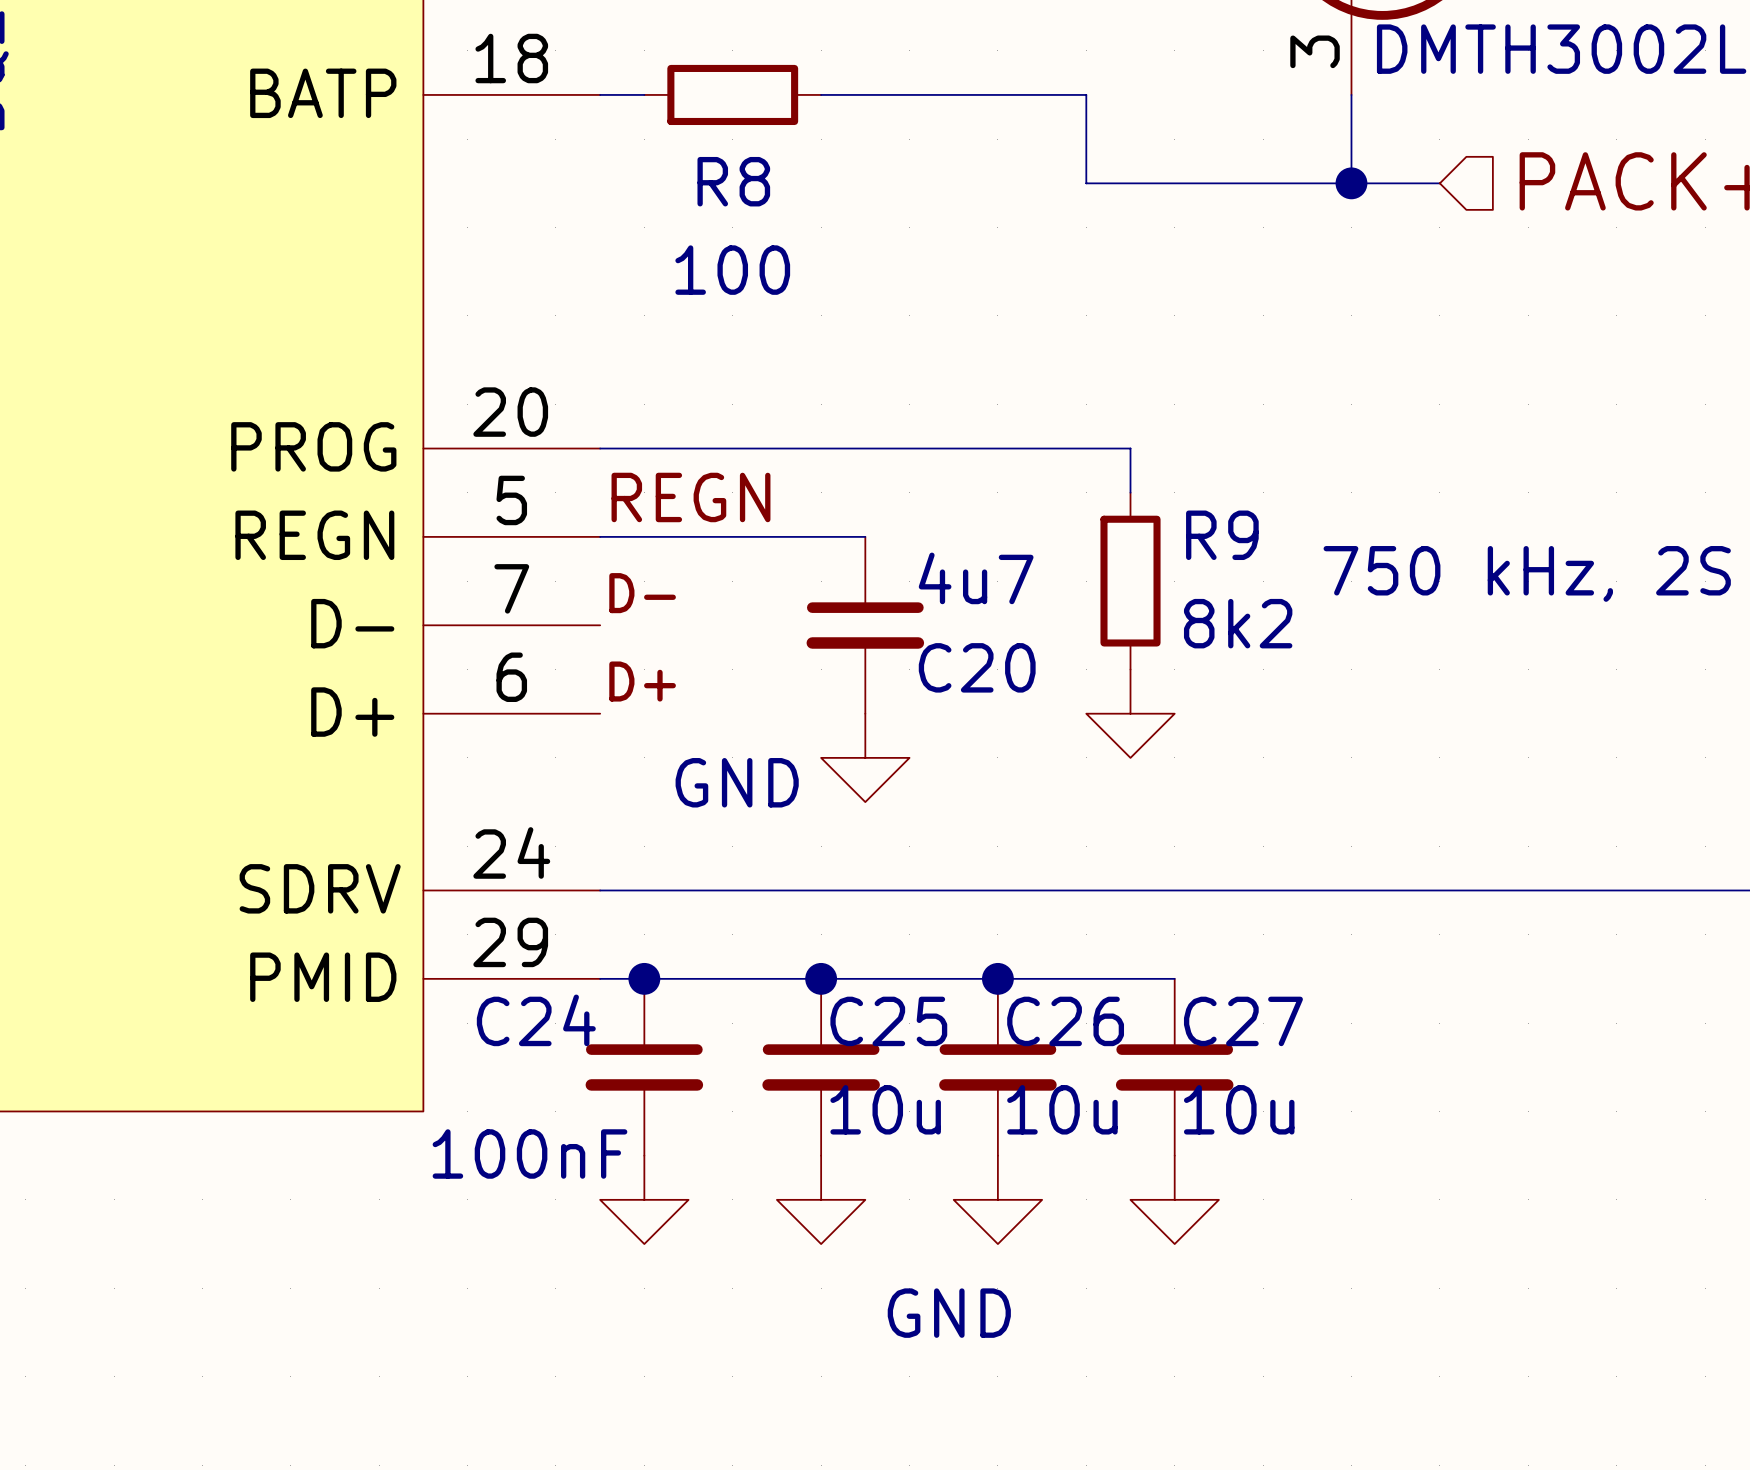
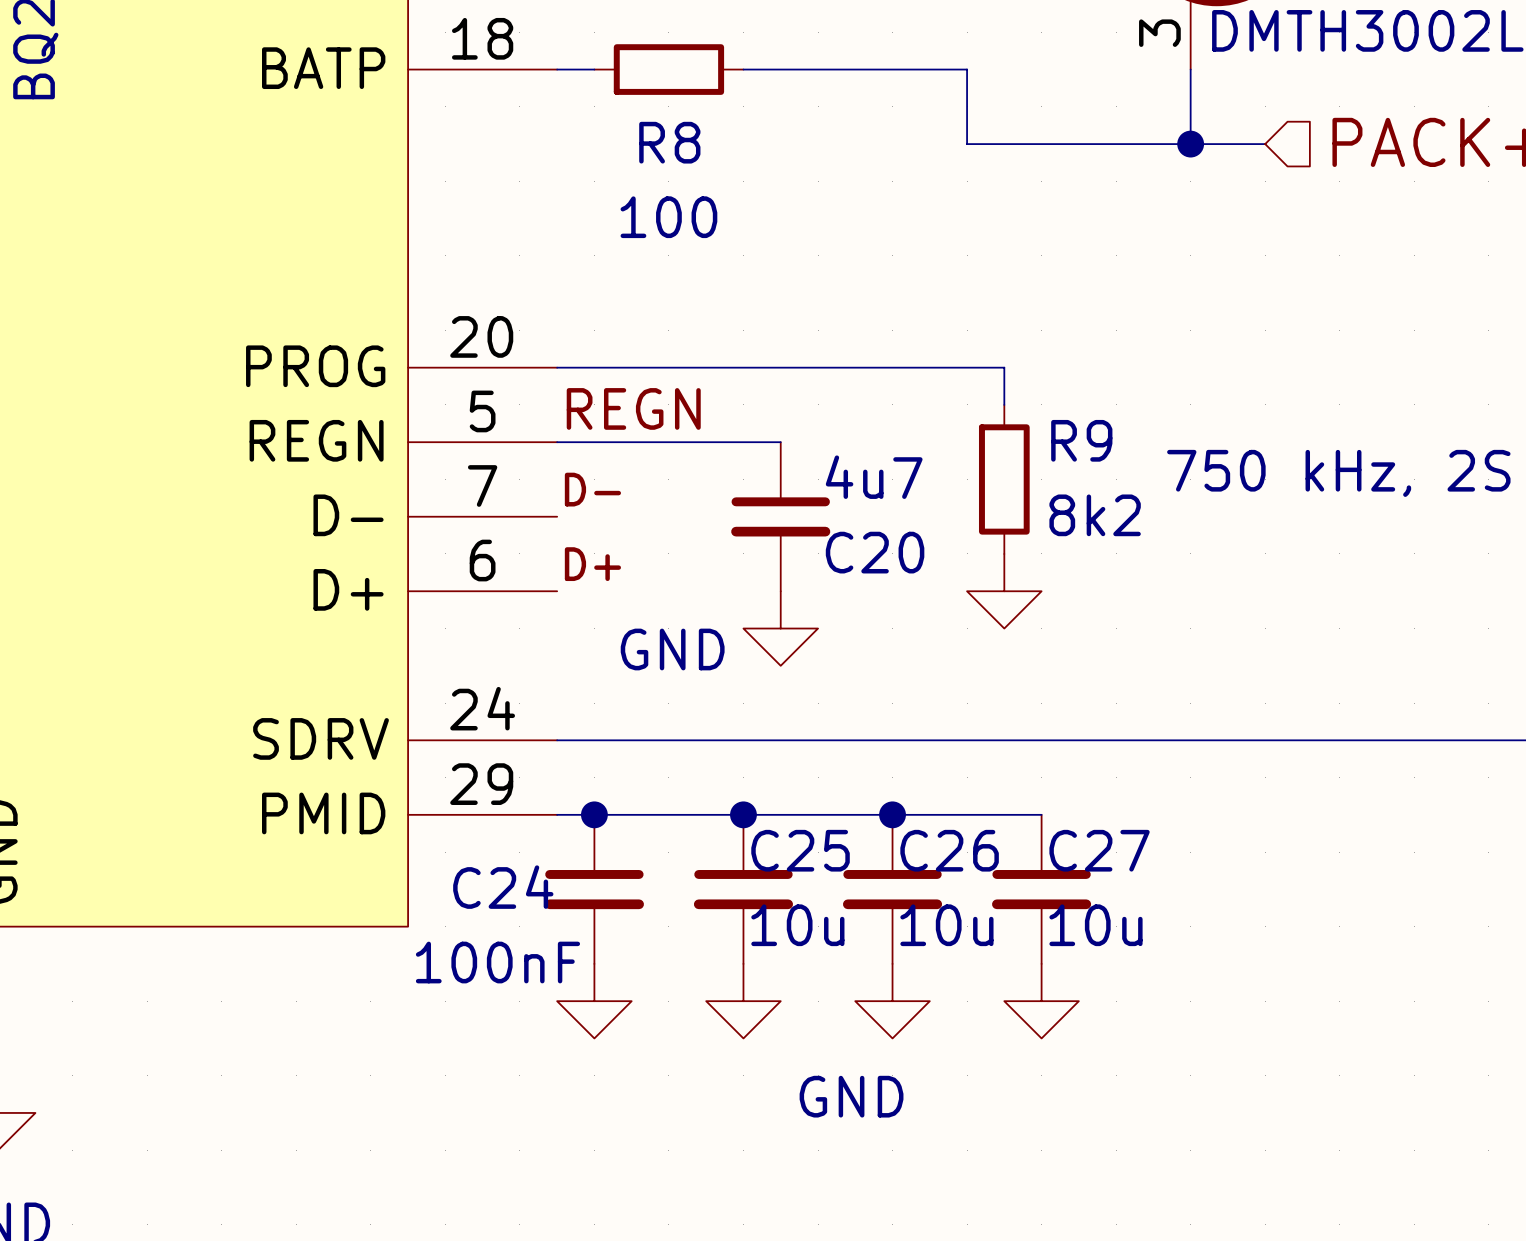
C24 name position: C24 (536, 1020) -> C24 (503, 887)

